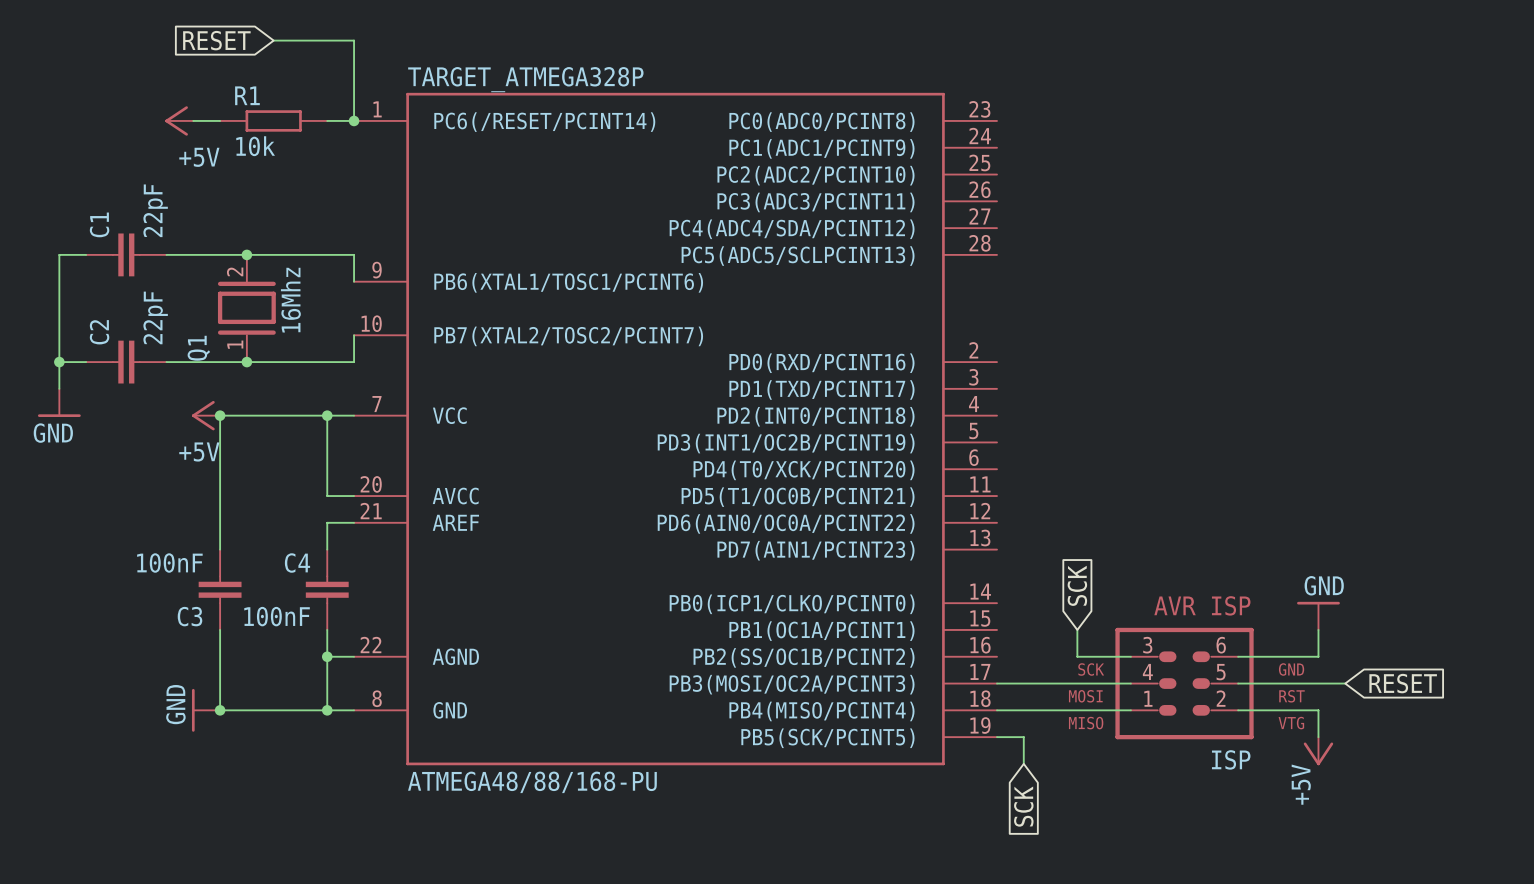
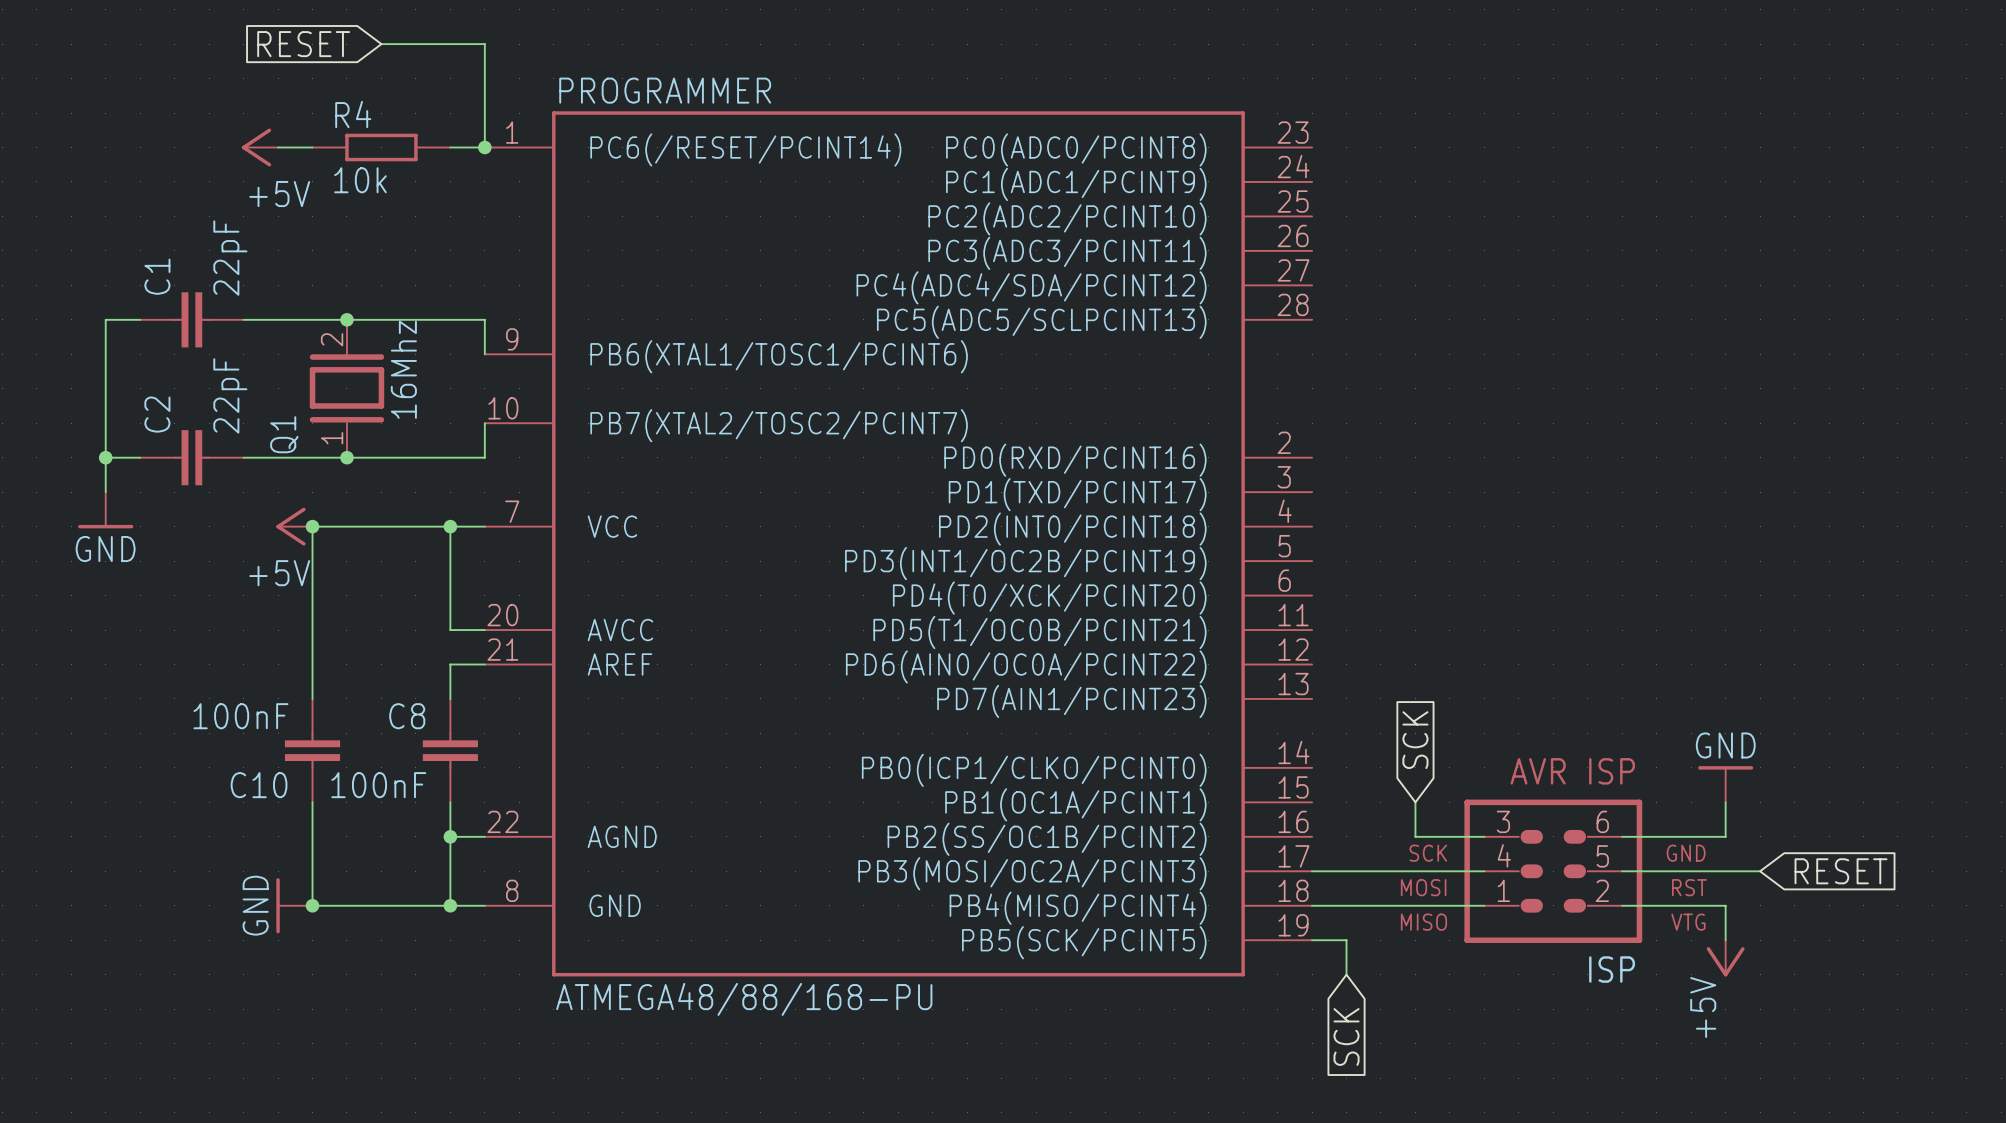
TARGET_ATMEGA328P name: TARGET_ATMEGA328P (525, 79) -> PROGRAMMER (665, 90)
R1 name: R1 (247, 95) -> R4 (353, 114)
C4 name: C4 (297, 563) -> C8 (407, 716)
C3 name: C3 (190, 616) -> C10 (259, 785)

